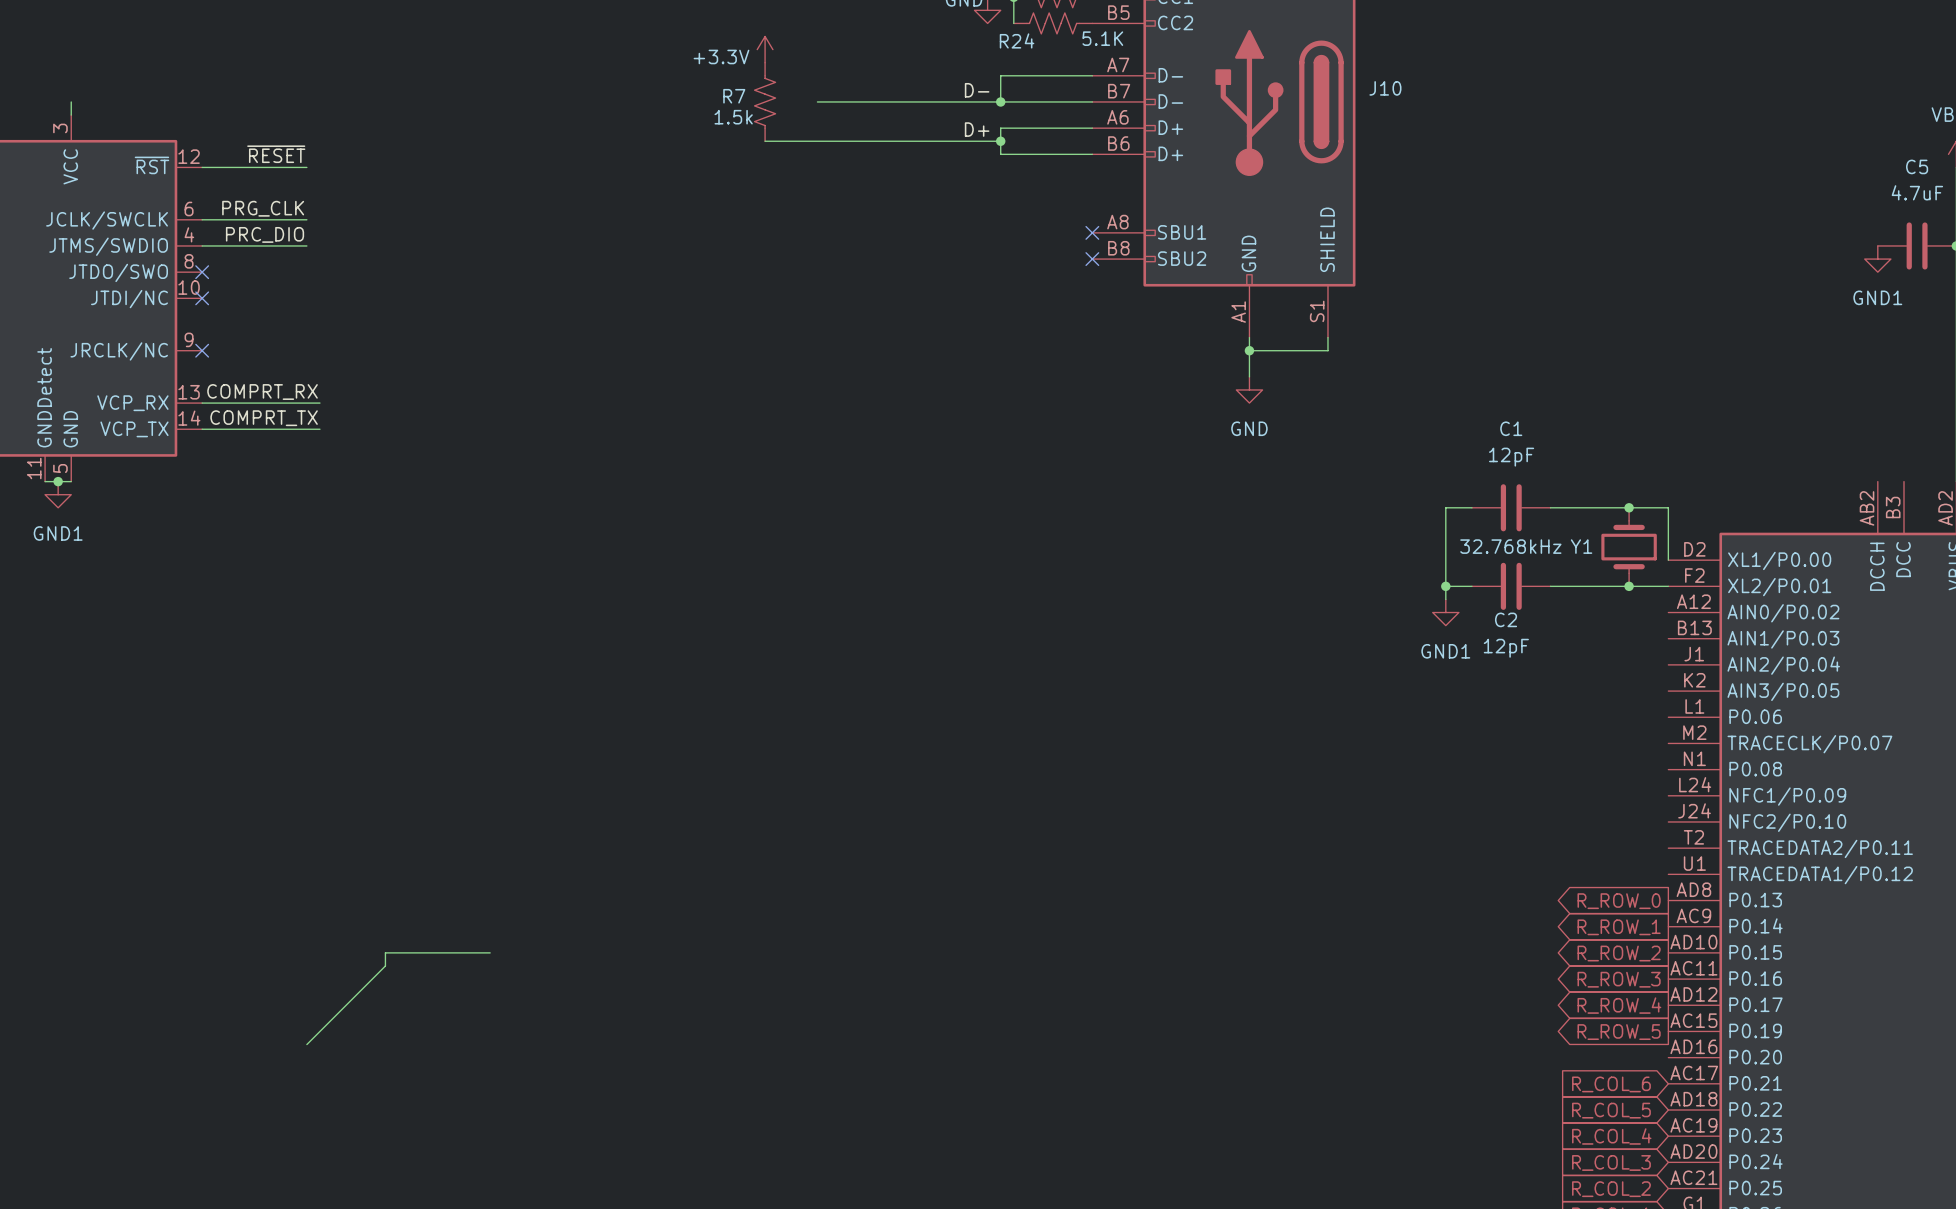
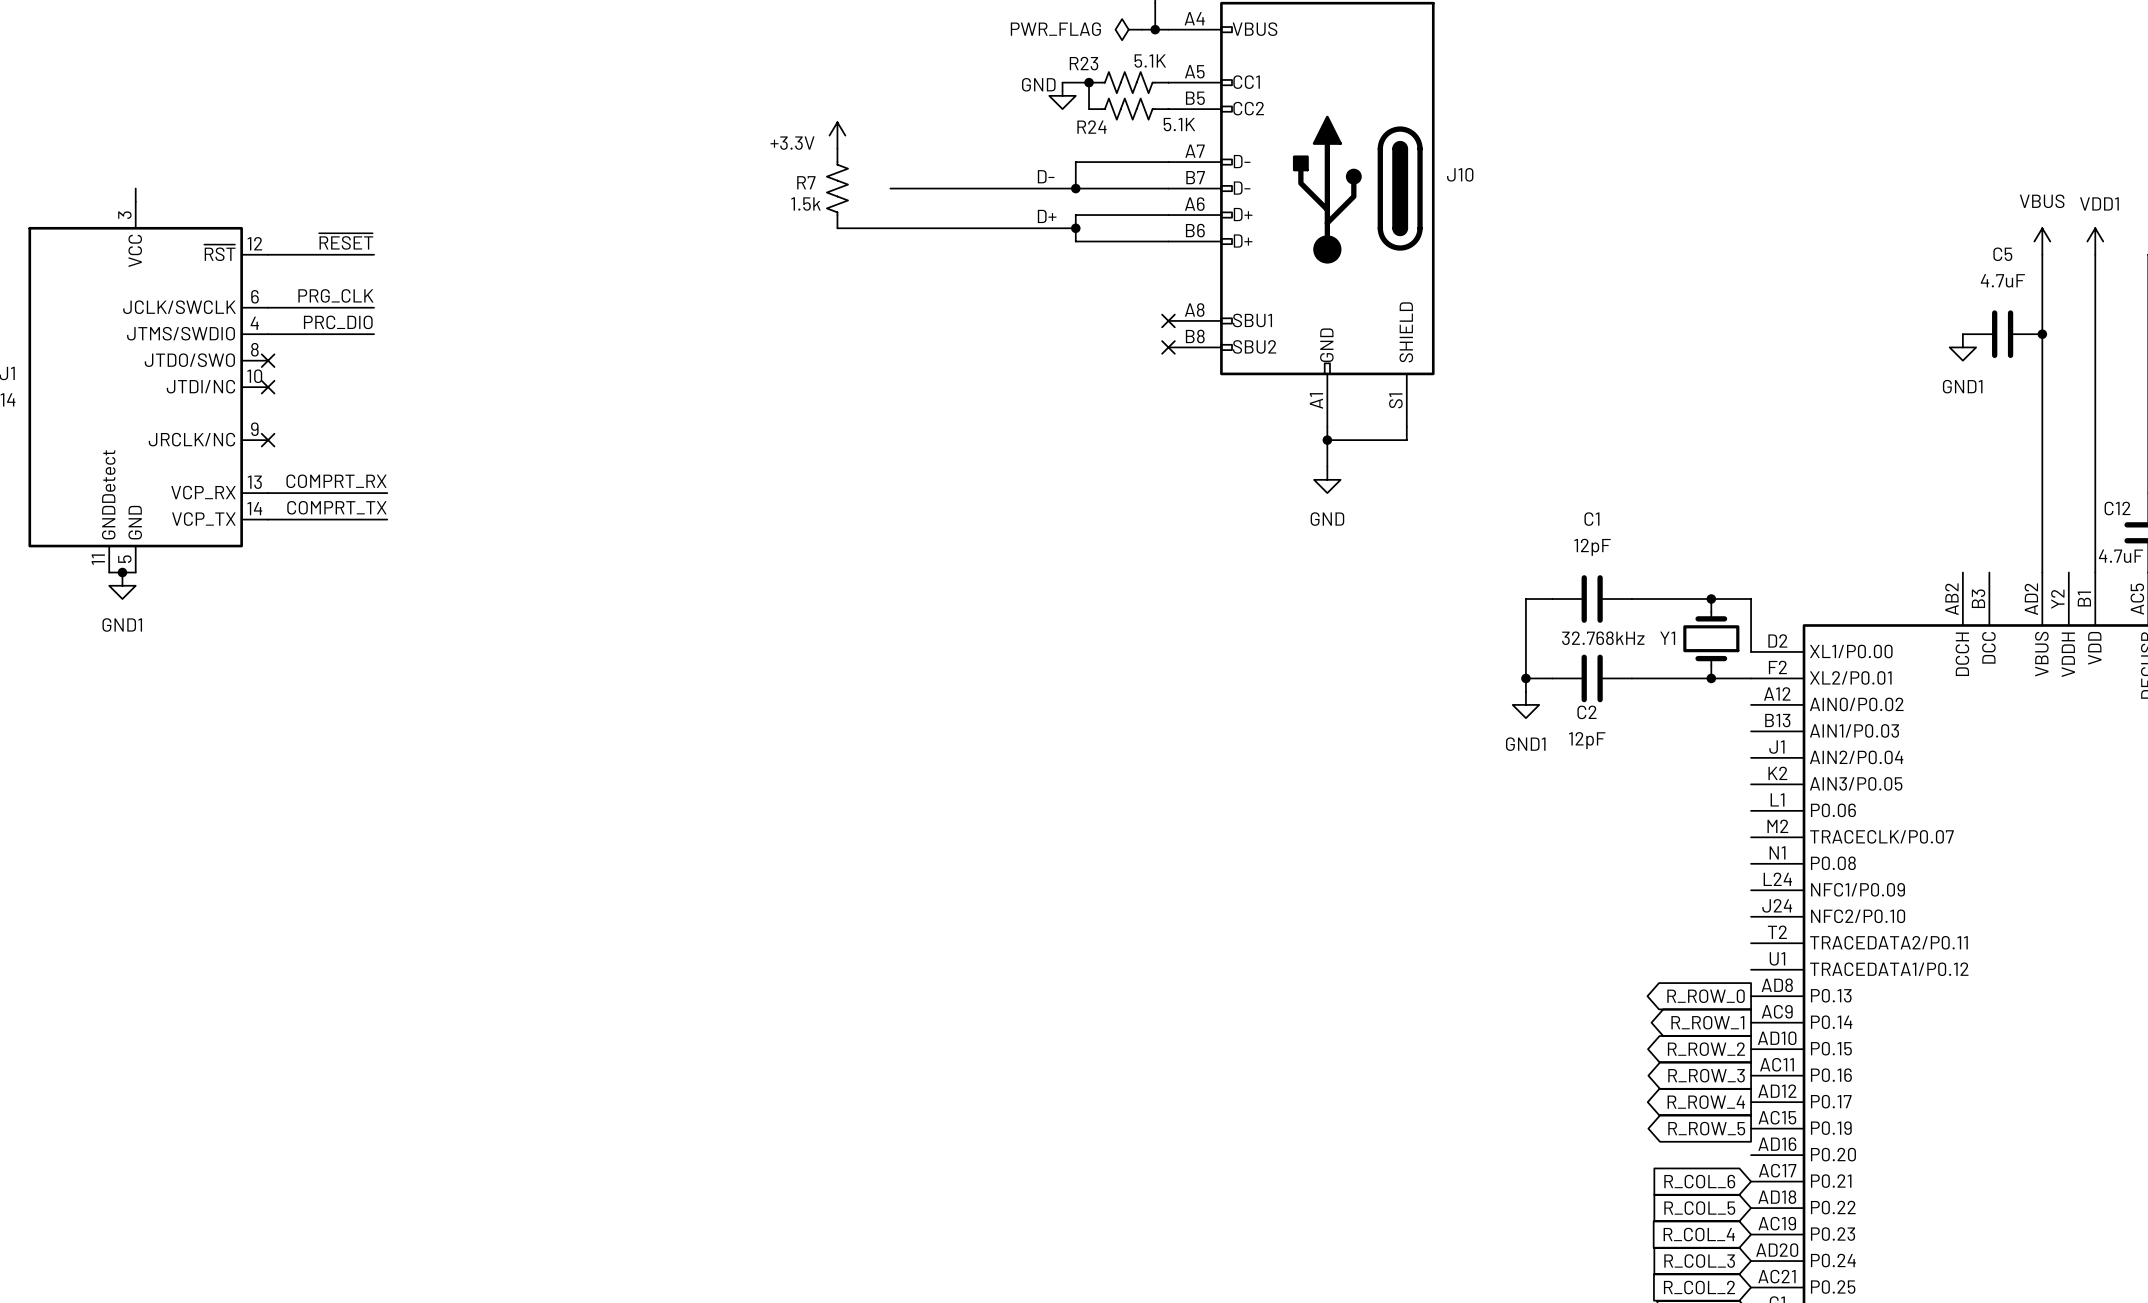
wire: (490, 952) (385, 952) (385, 965) (306, 1044) -> none

